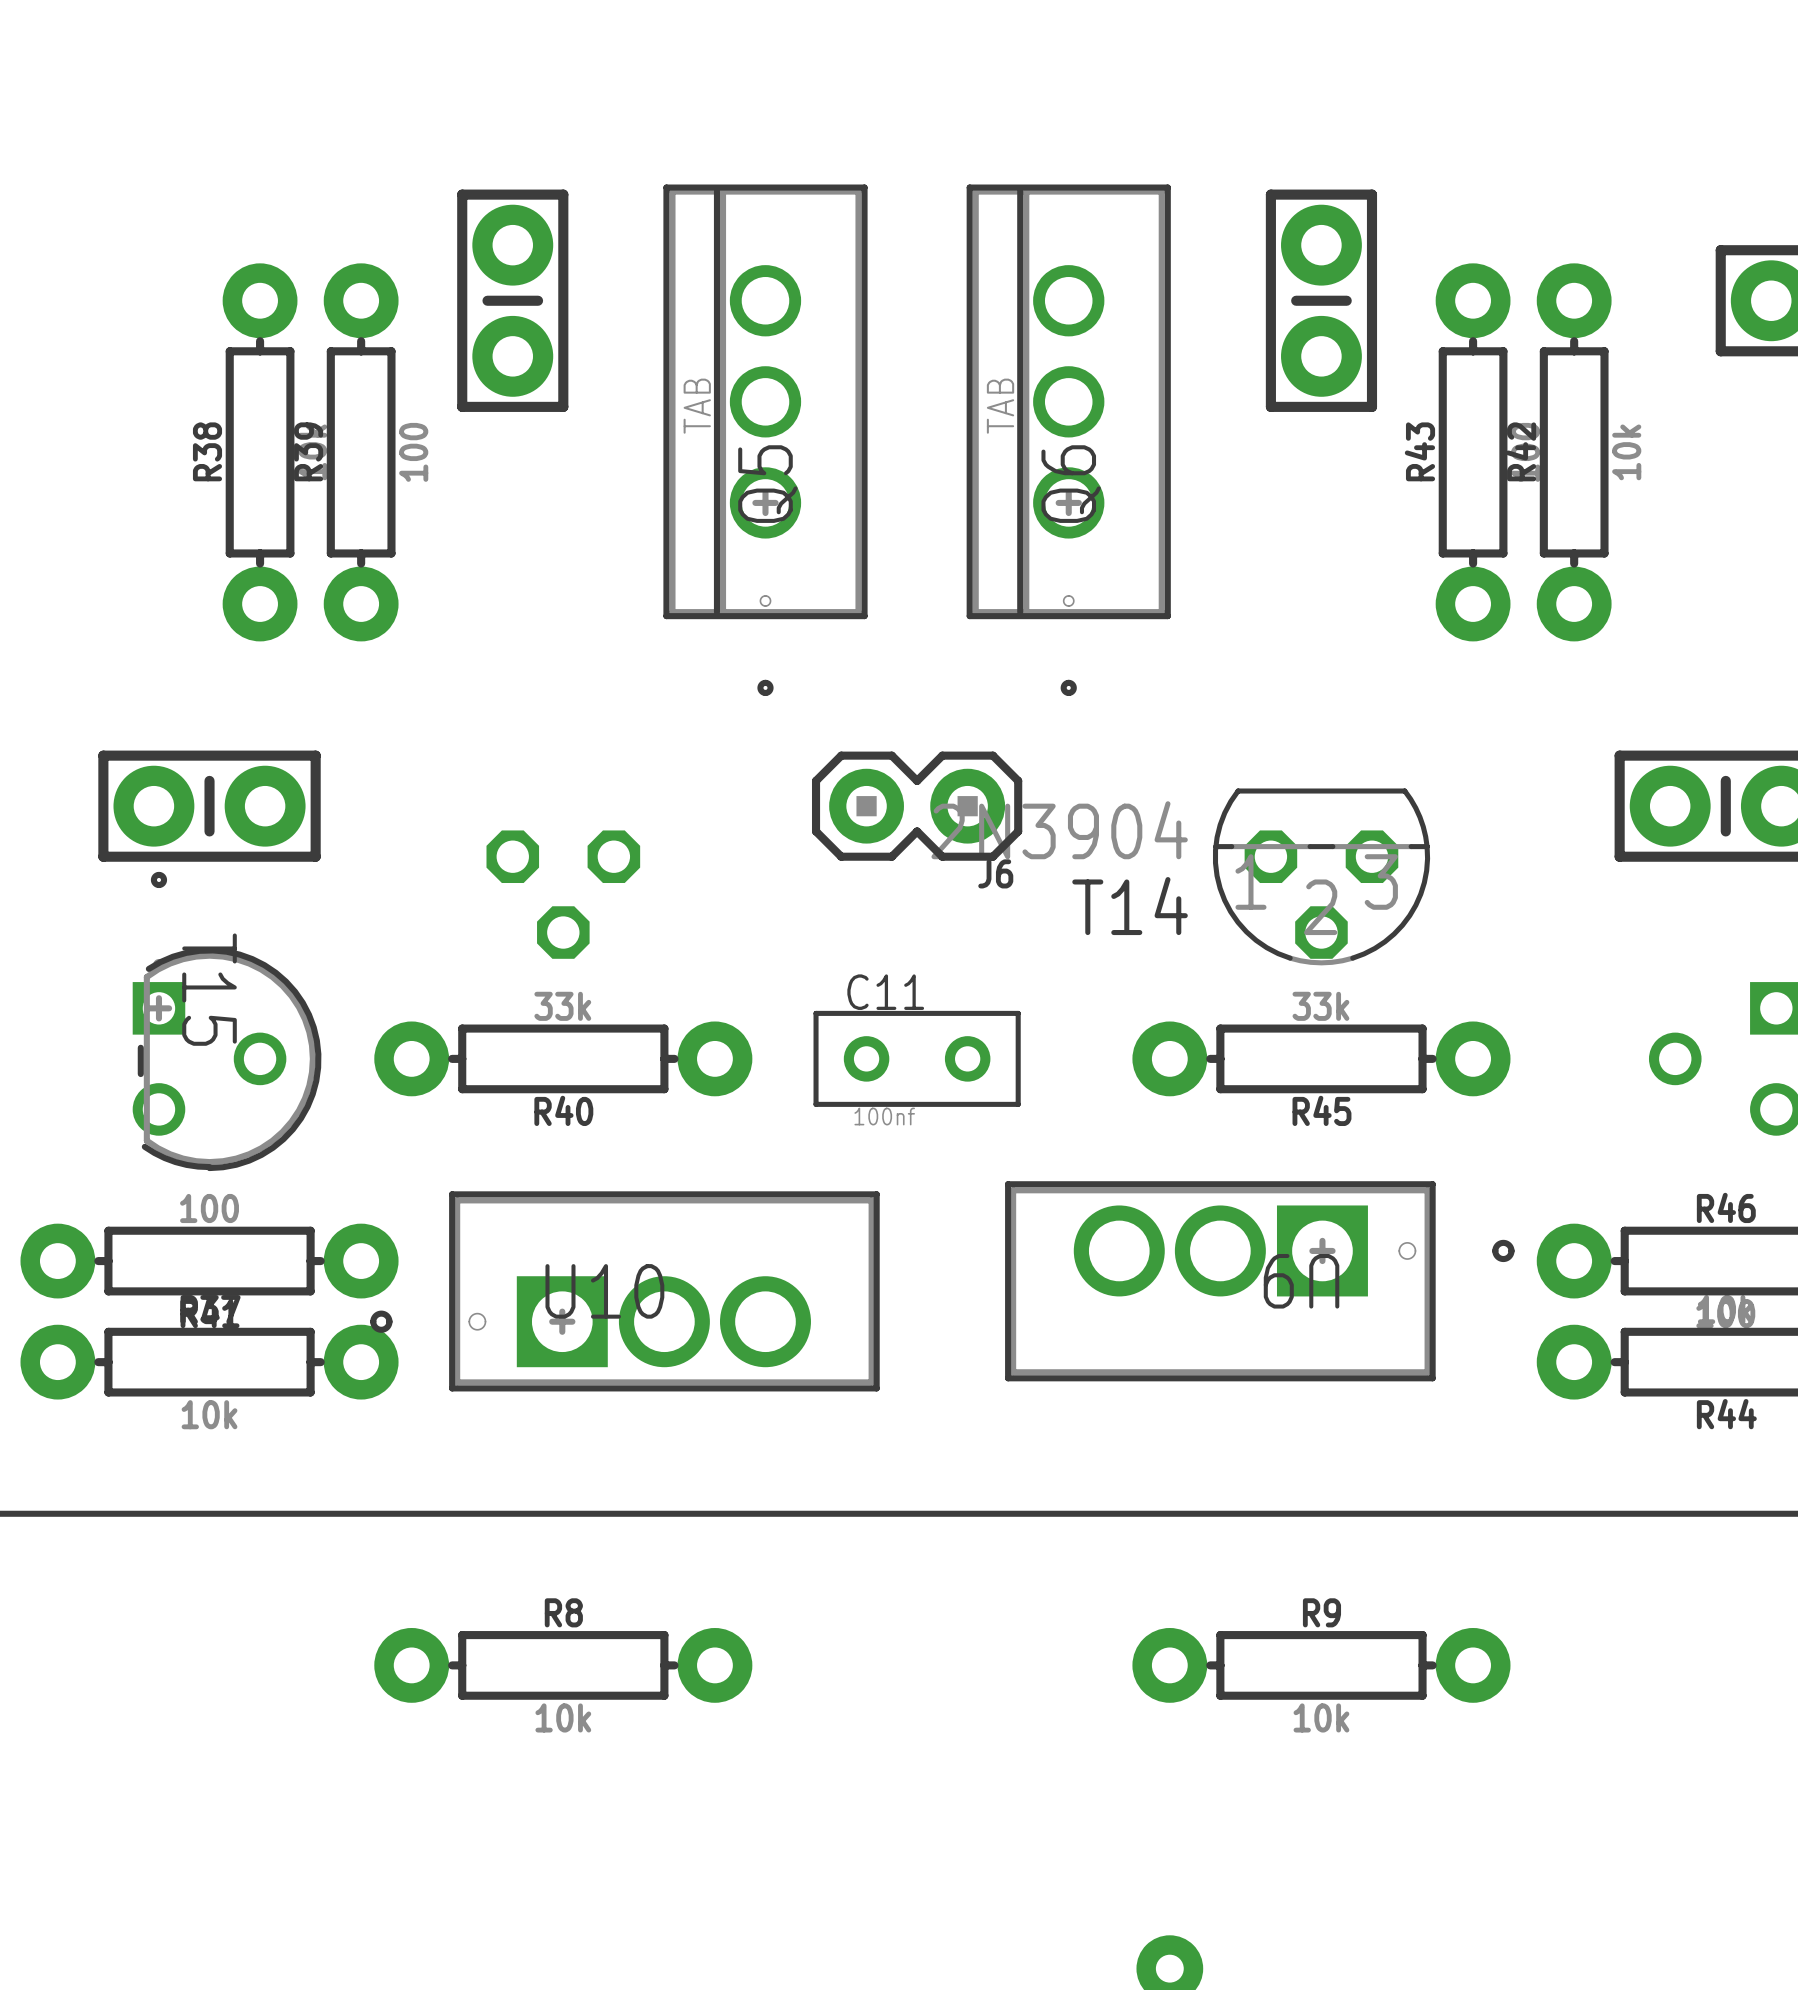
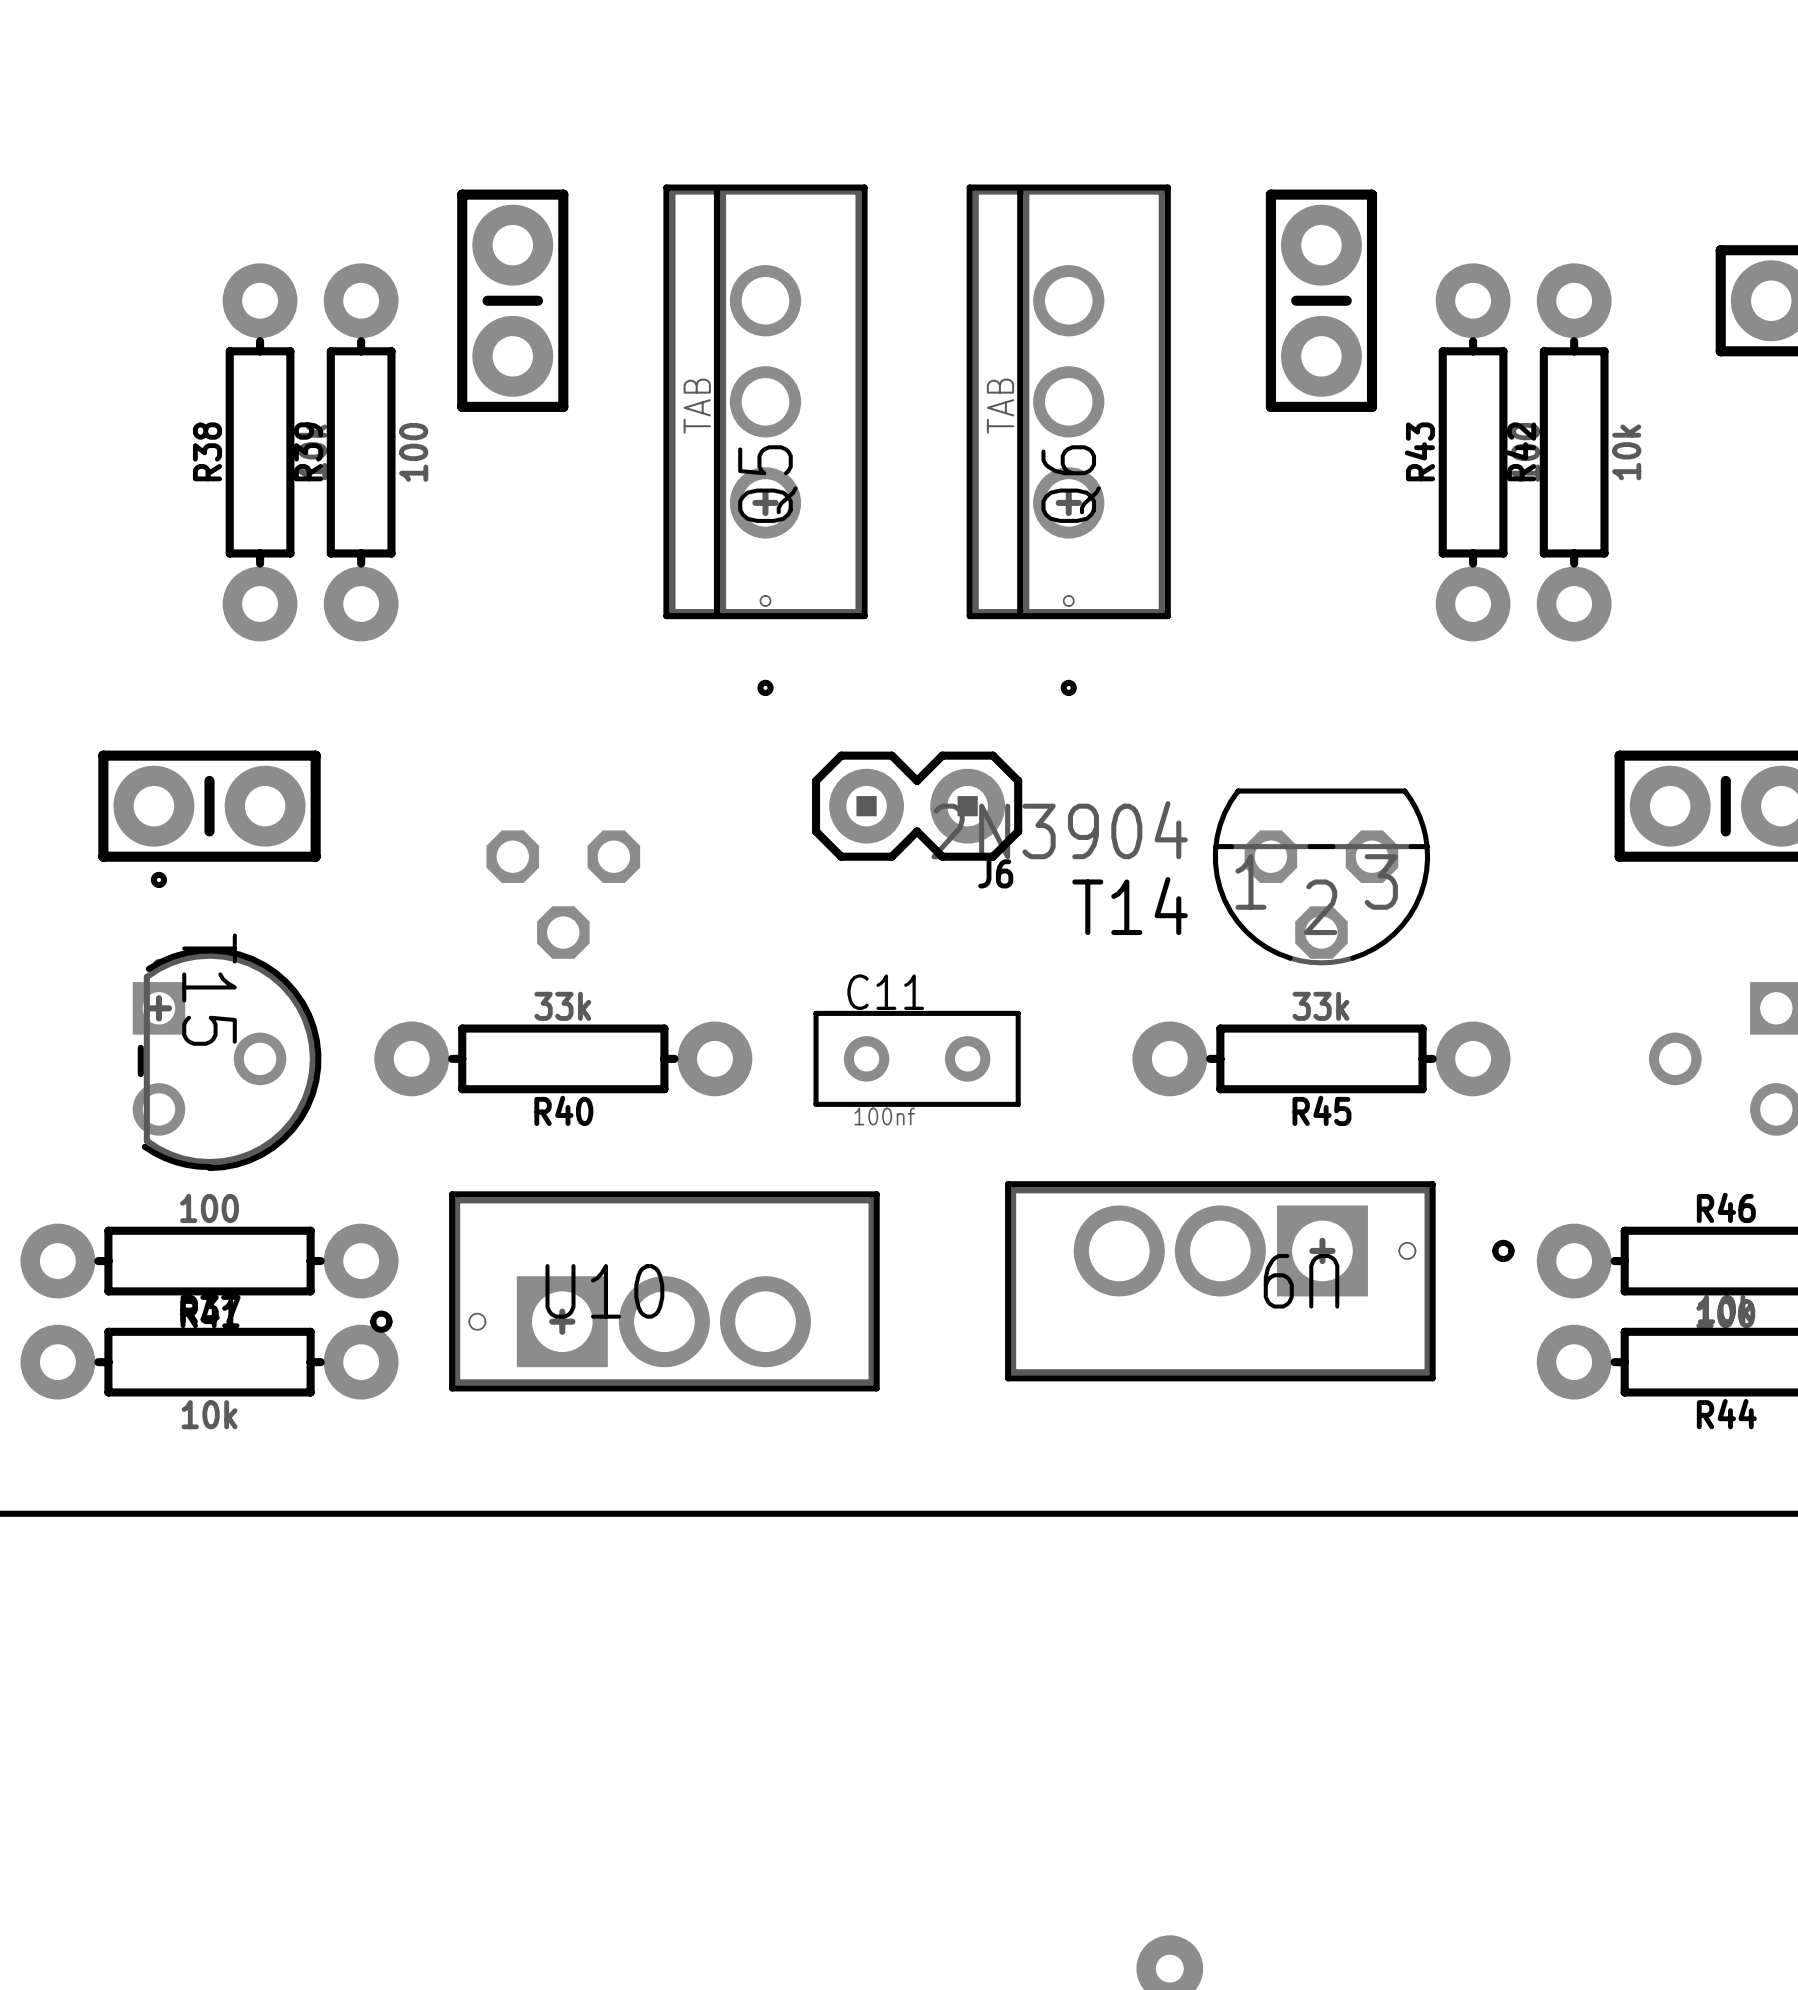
R8: 10k (563, 1665) -> none
R9: 10k (1321, 1665) -> none

